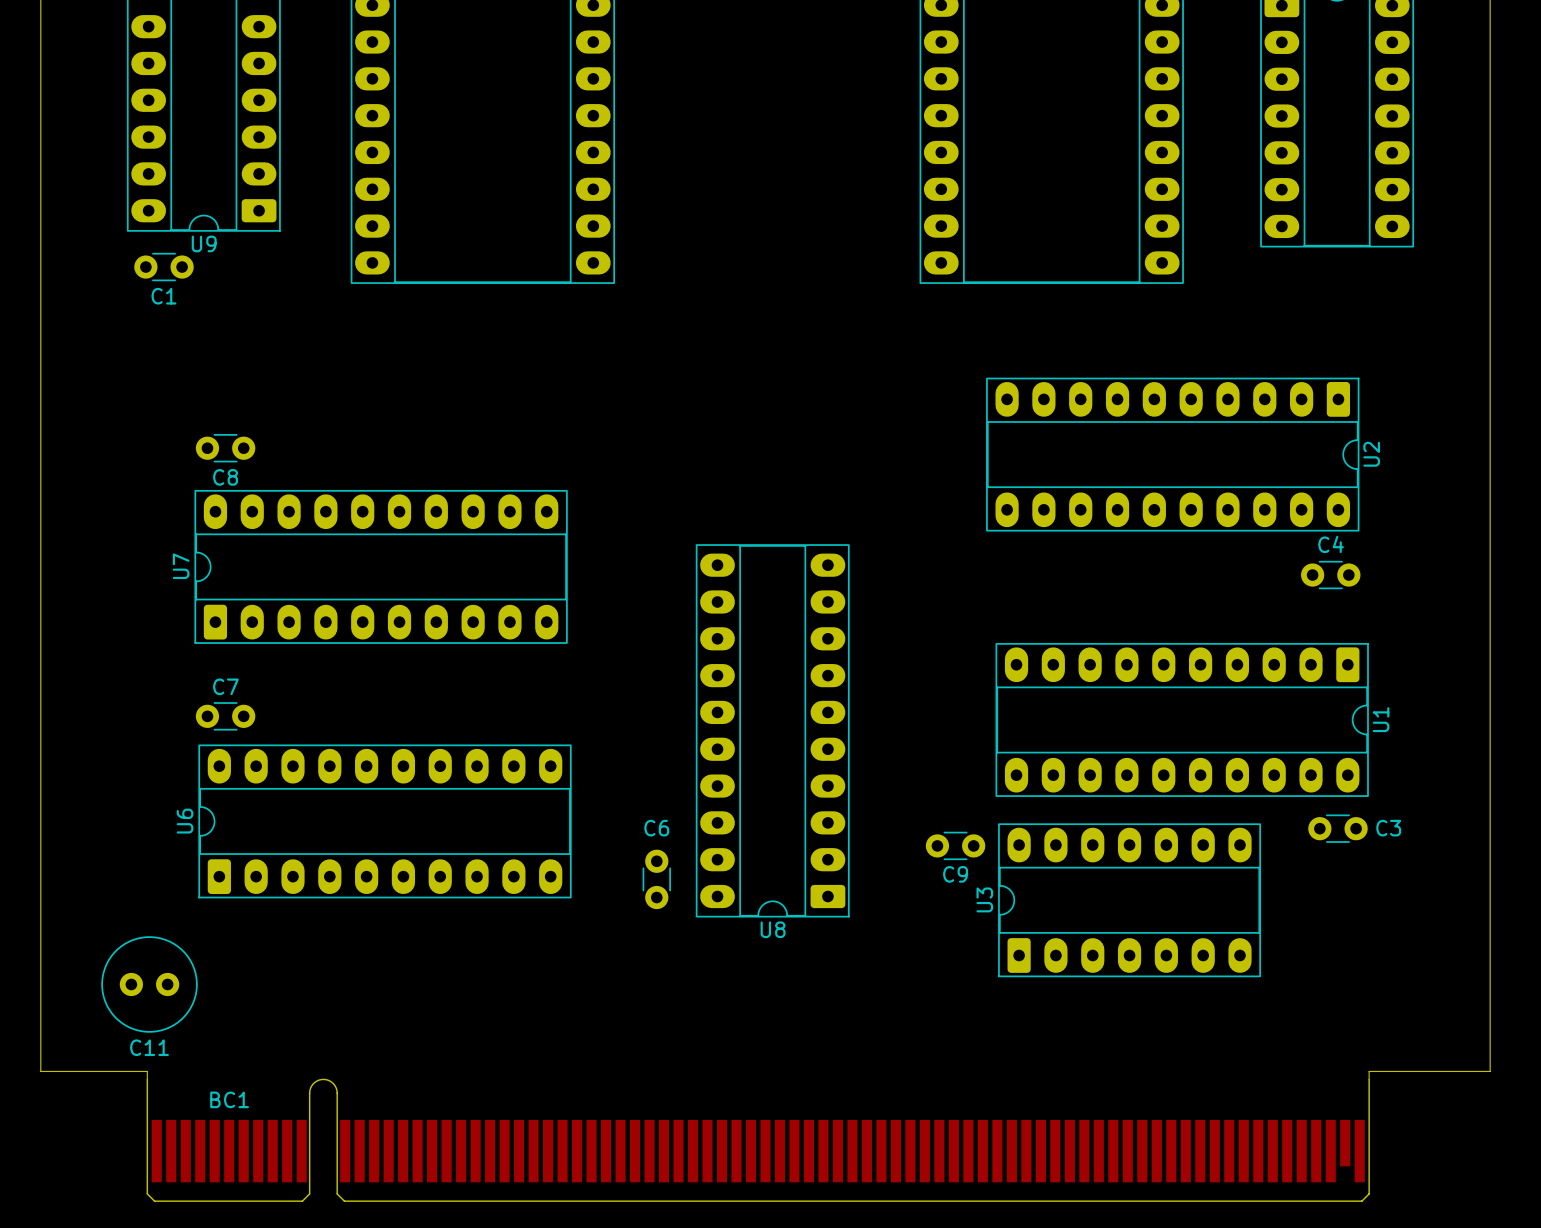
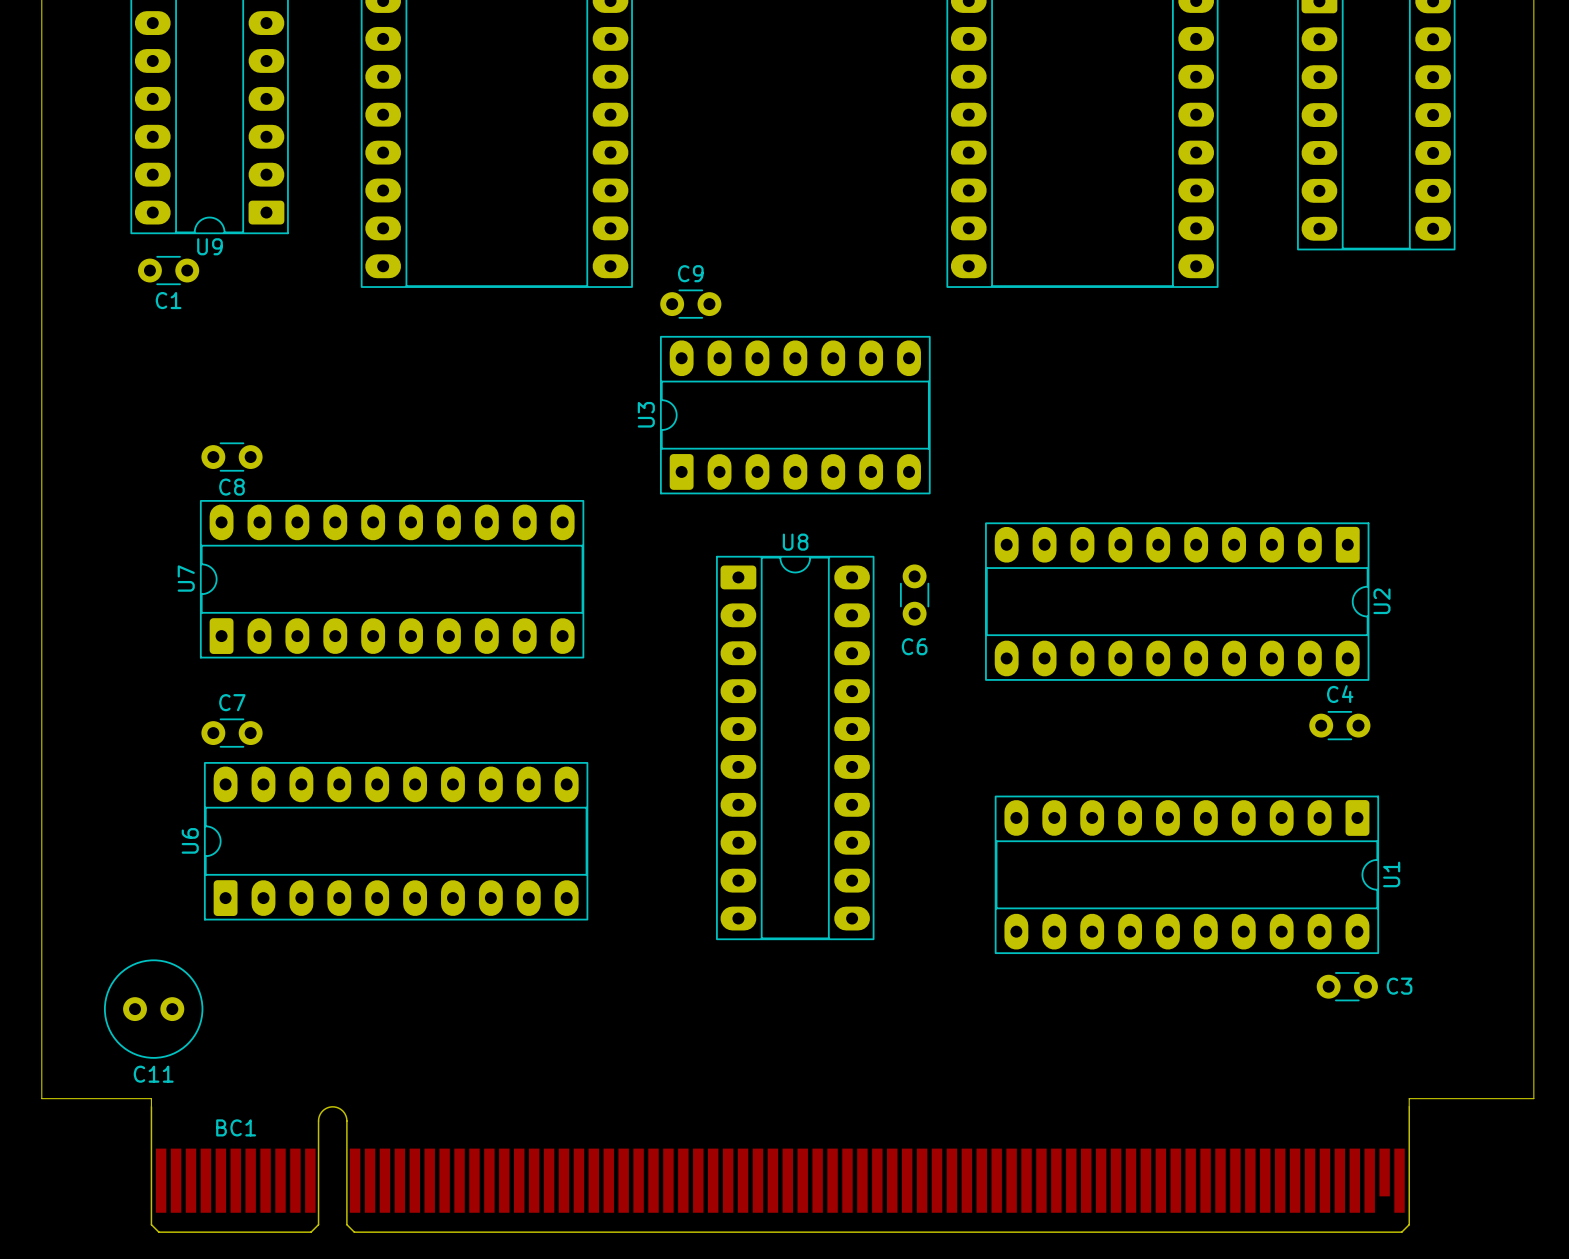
U2 position: (1172, 454) -> (1177, 601)
C4 position: (1330, 575) -> (1339, 725)
U1 position: (1182, 719) -> (1186, 874)
U8 rotation: 0° (772, 730) -> 180° (795, 747)
C6 name position: C6 (656, 828) -> C6 (914, 646)
C3 position: (1337, 828) -> (1347, 986)
C9 position: (955, 845) -> (690, 304)
C9 name position: C9 (955, 874) -> C9 (690, 273)
C6 position: (656, 879) -> (914, 595)
U3 position: (1129, 900) -> (795, 415)

